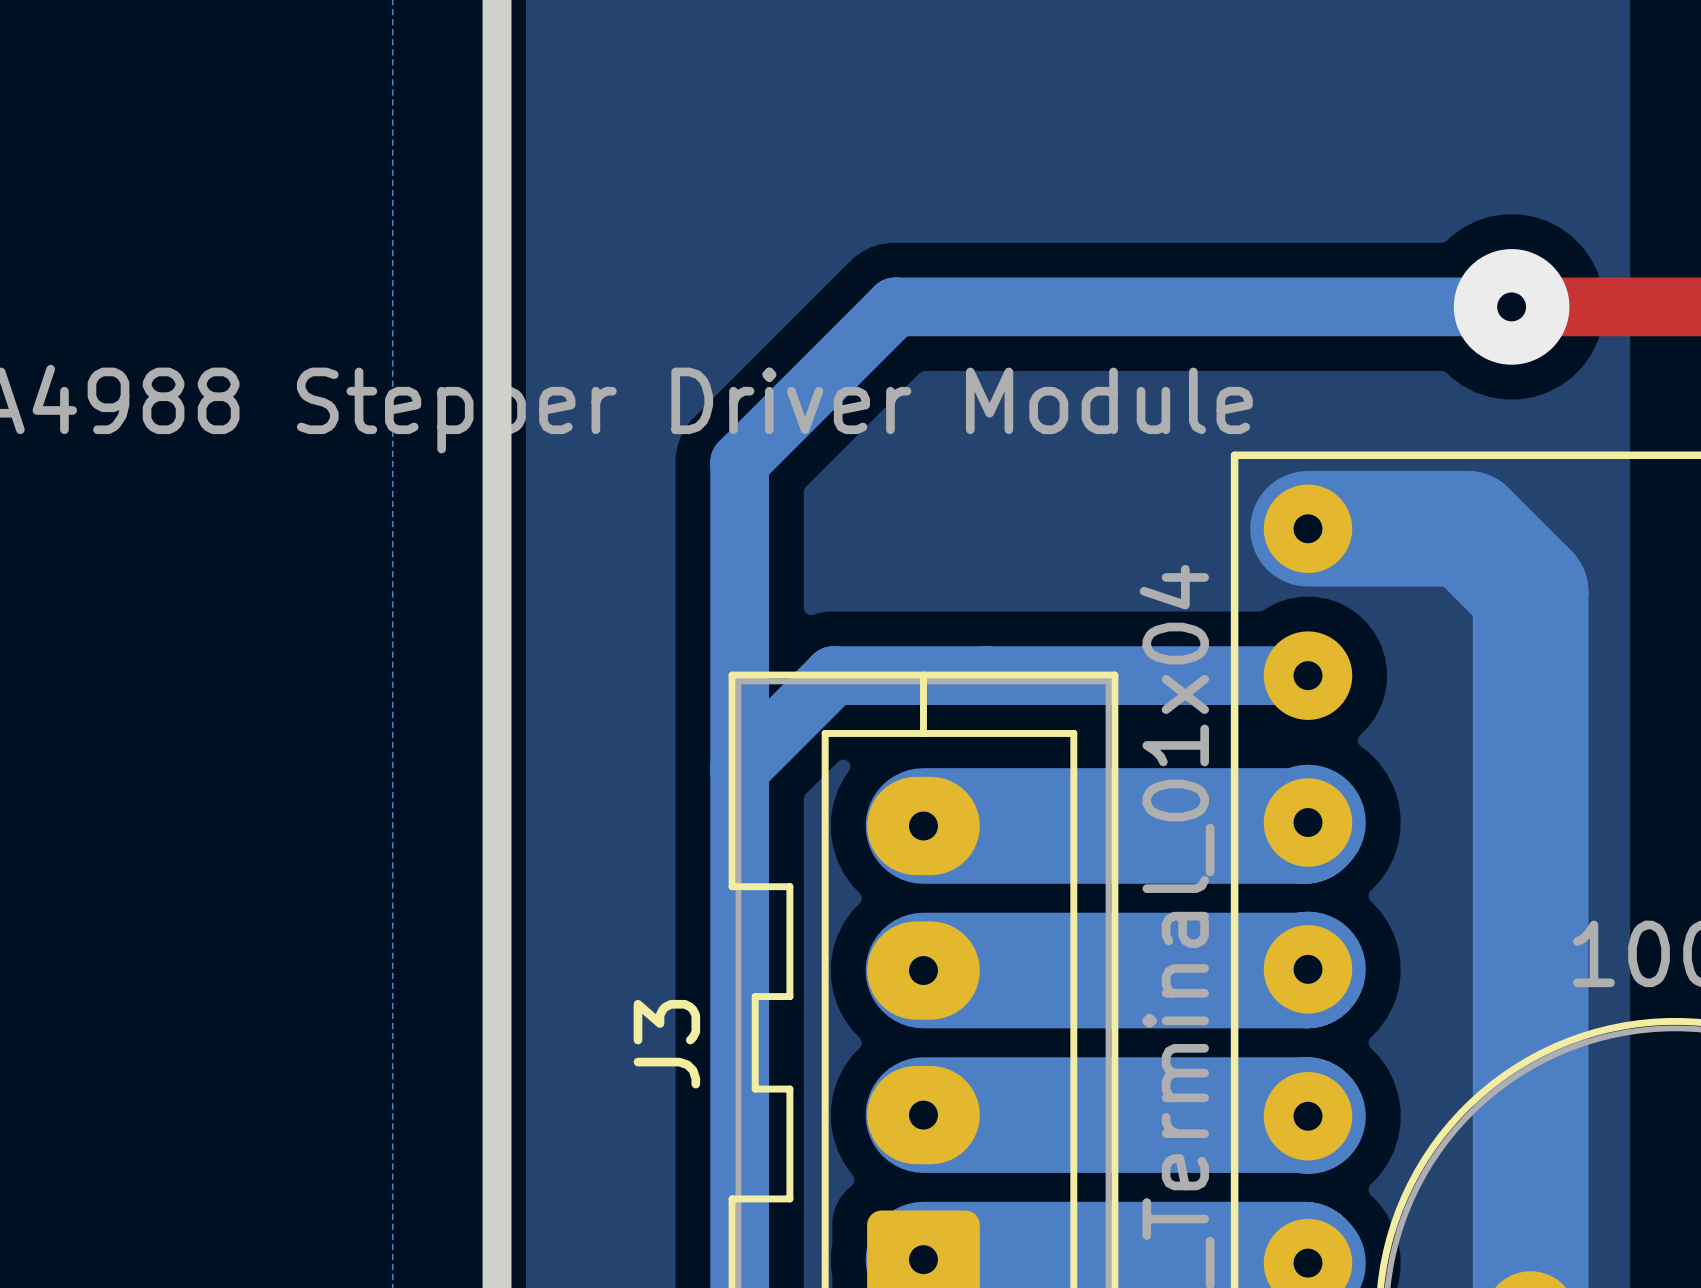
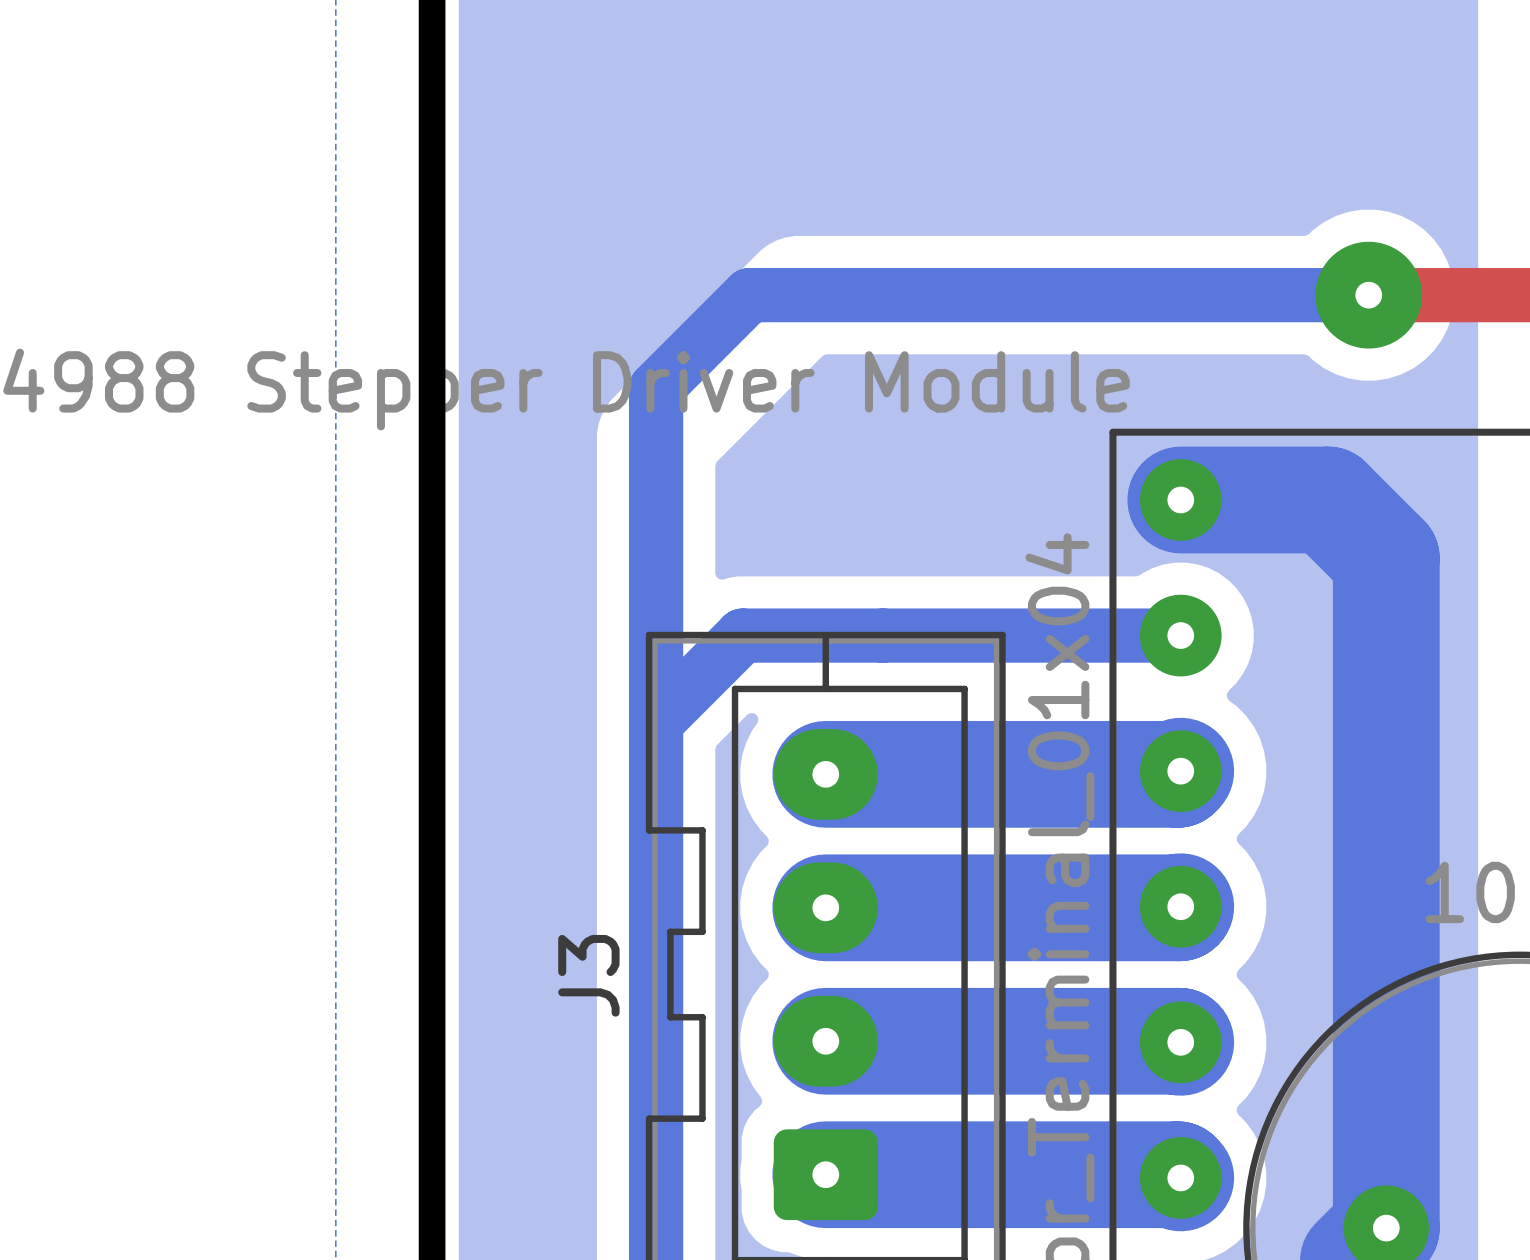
bottom track: (895, 306) (739, 462) -> (799, 295) (749, 295) (656, 388) (656, 438)

